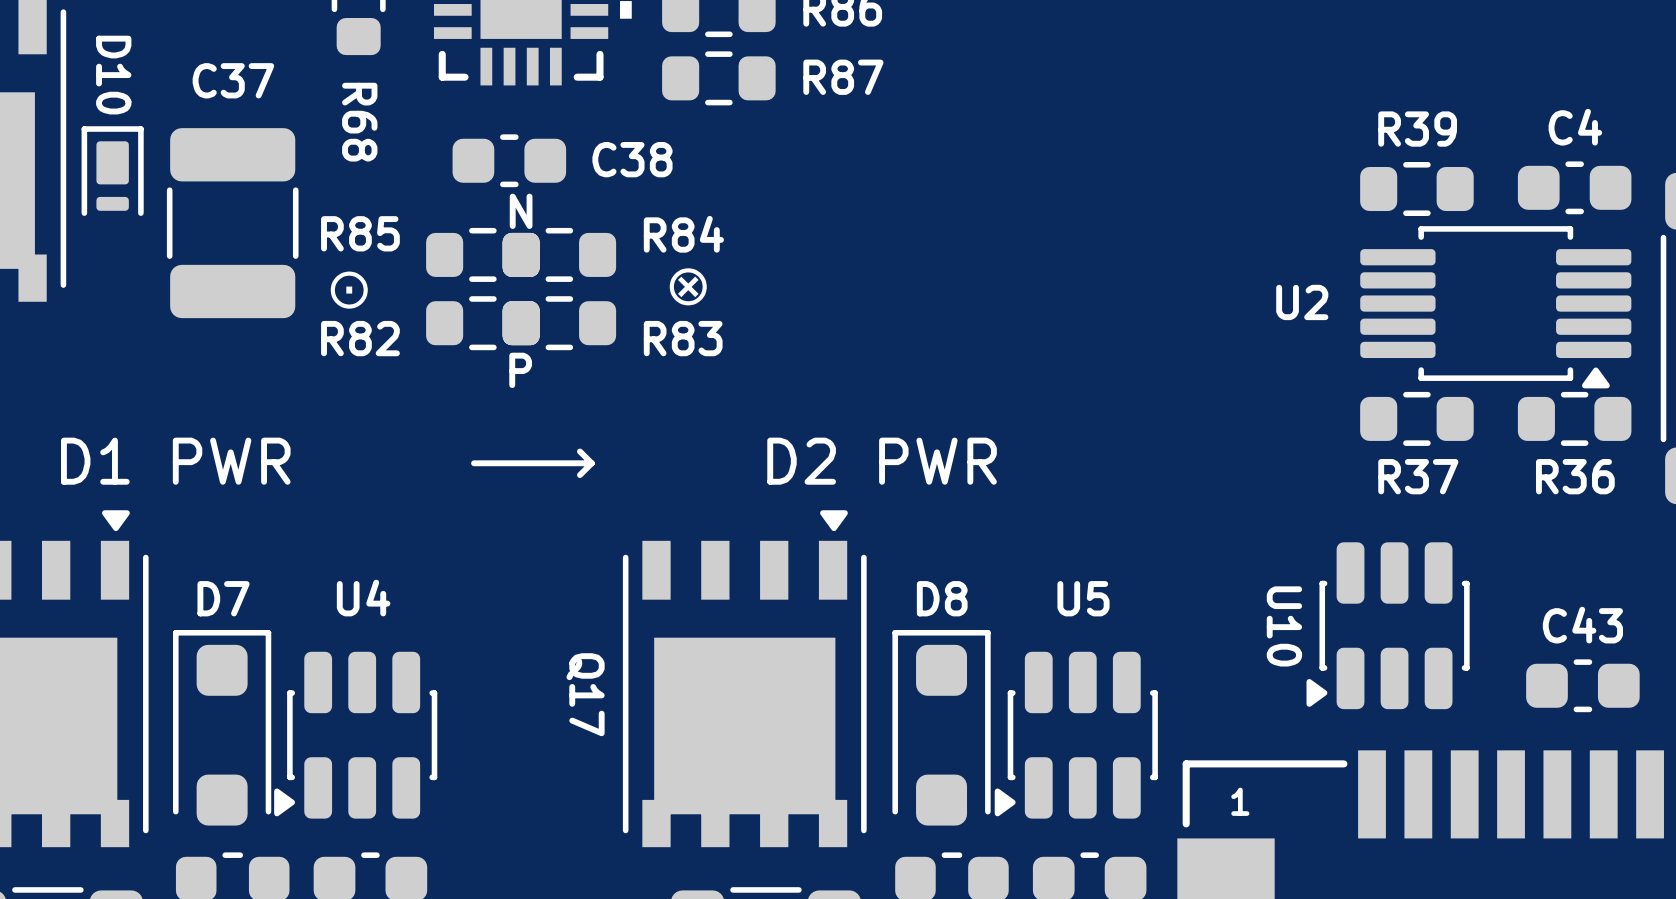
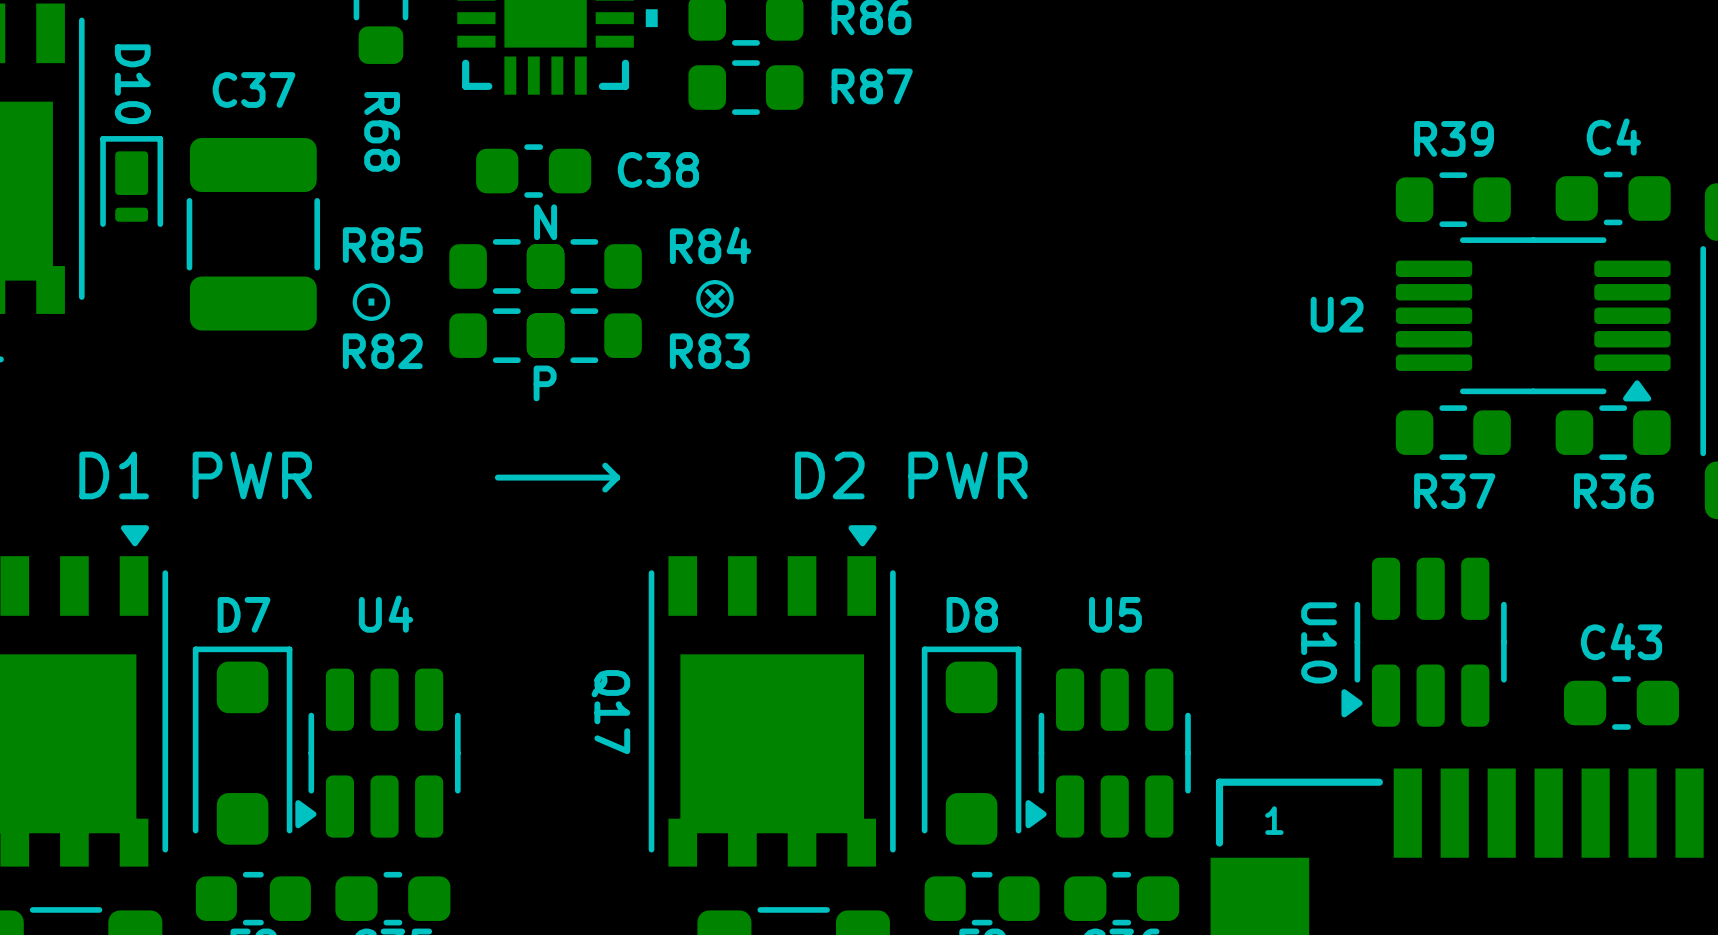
U2 footprint: [1360, 226, 1632, 389] -> [1395, 237, 1671, 402]
U10 footprint: [1306, 542, 1470, 710] -> [1341, 557, 1507, 727]
U4 footprint: [274, 651, 438, 819] -> [295, 668, 461, 838]
U5 footprint: [994, 651, 1158, 819] -> [1025, 668, 1191, 838]

